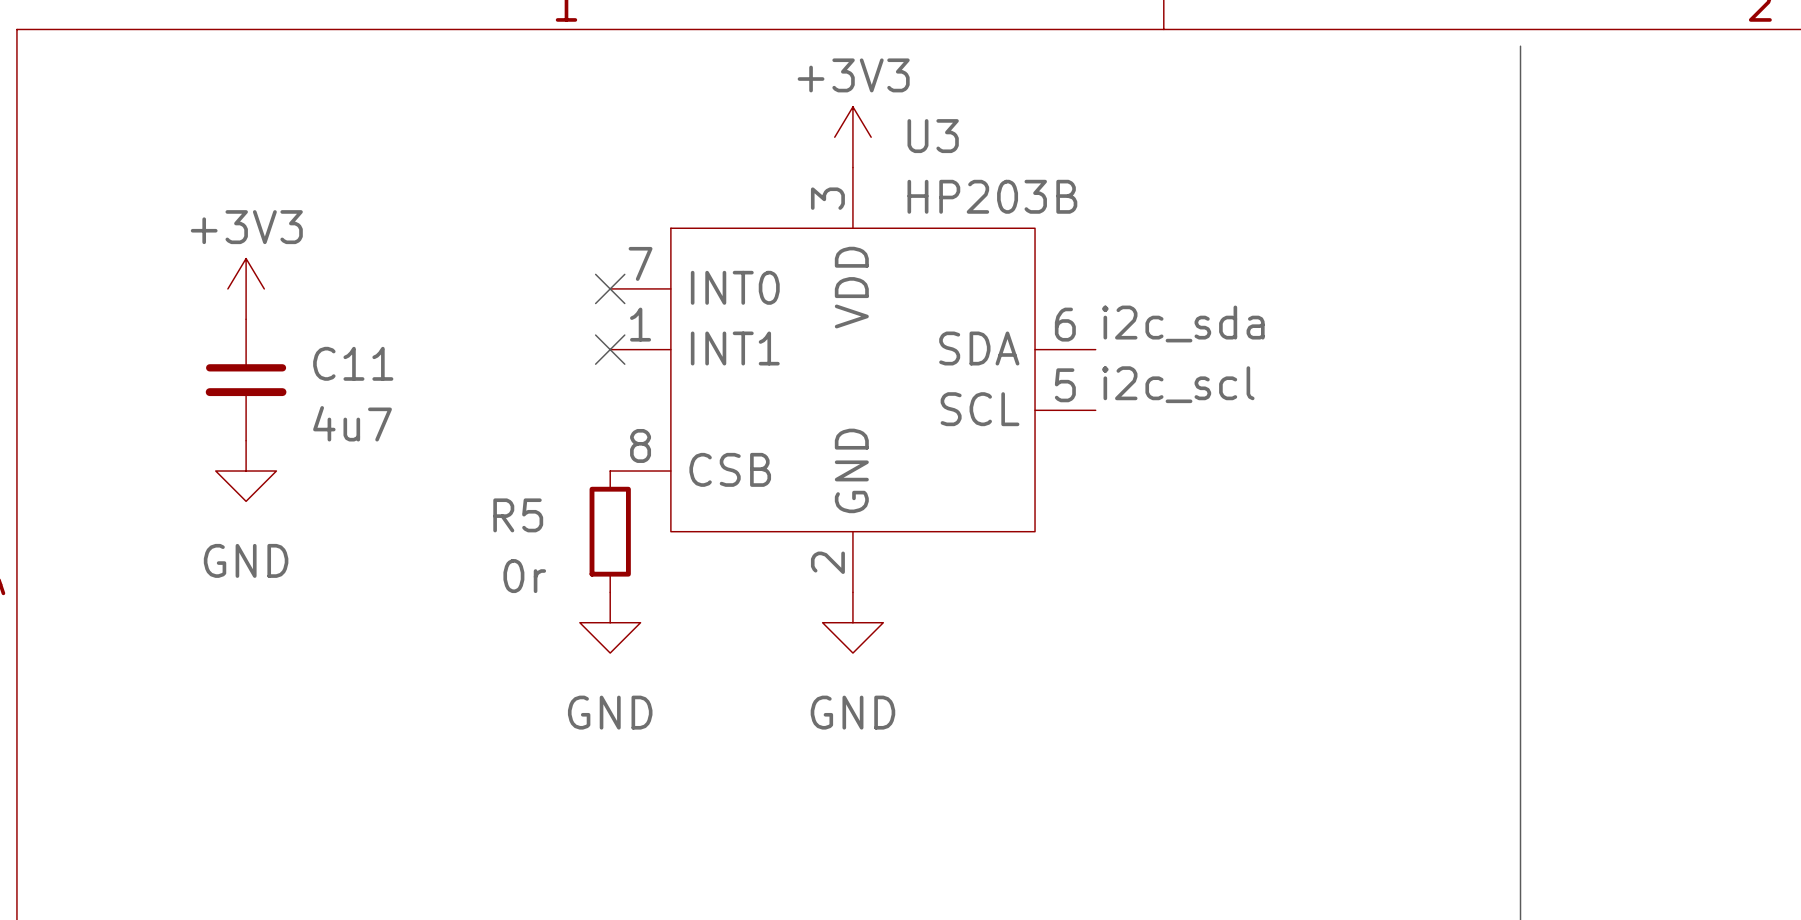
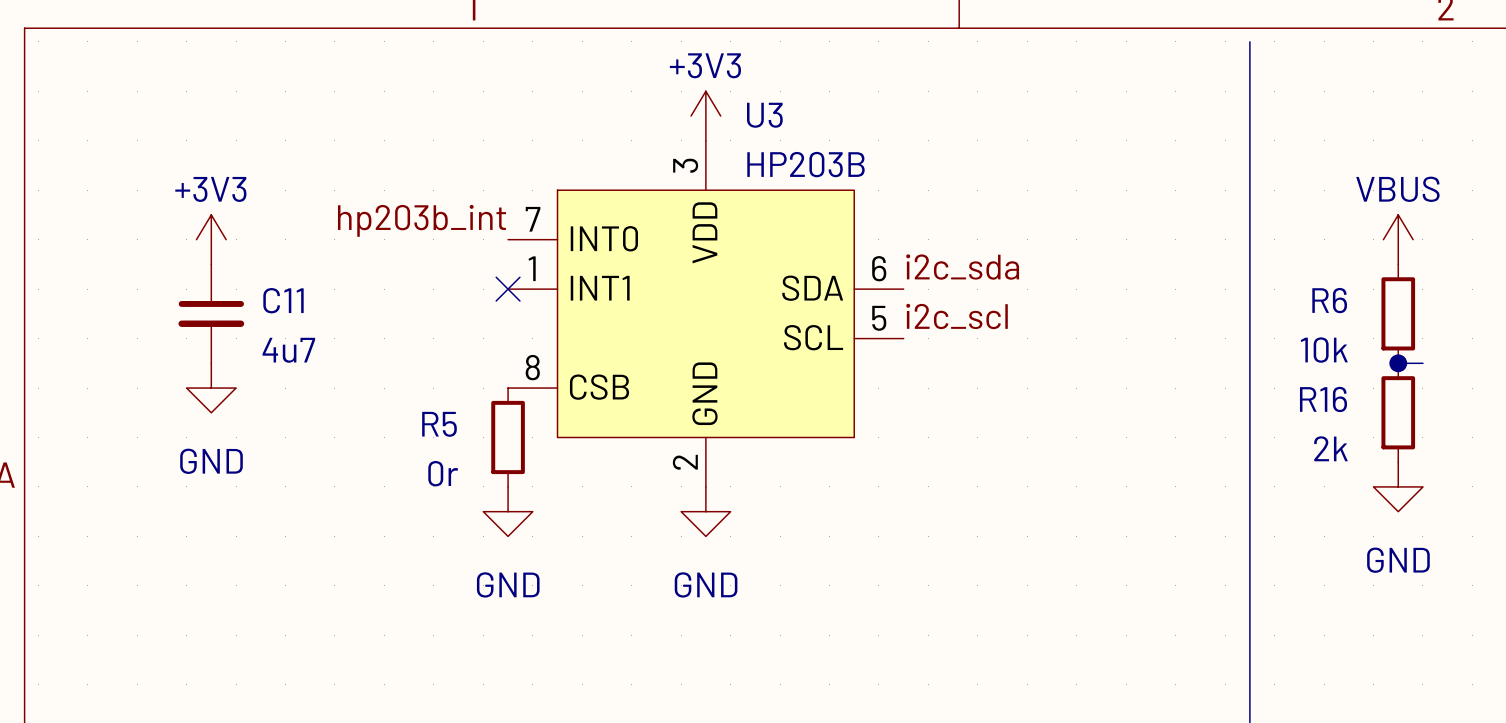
label: none -> hp203b_int (422, 220)
no-connect mark: (610, 288) -> none
power symbol: none -> VBUS (1398, 239)
R6: none -> 10k (1398, 313)
wire: none -> (1398, 363) (1422, 363)
junction: none -> (1398, 363)
R16: none -> 2k (1398, 412)
power symbol: none -> GND (1398, 486)

